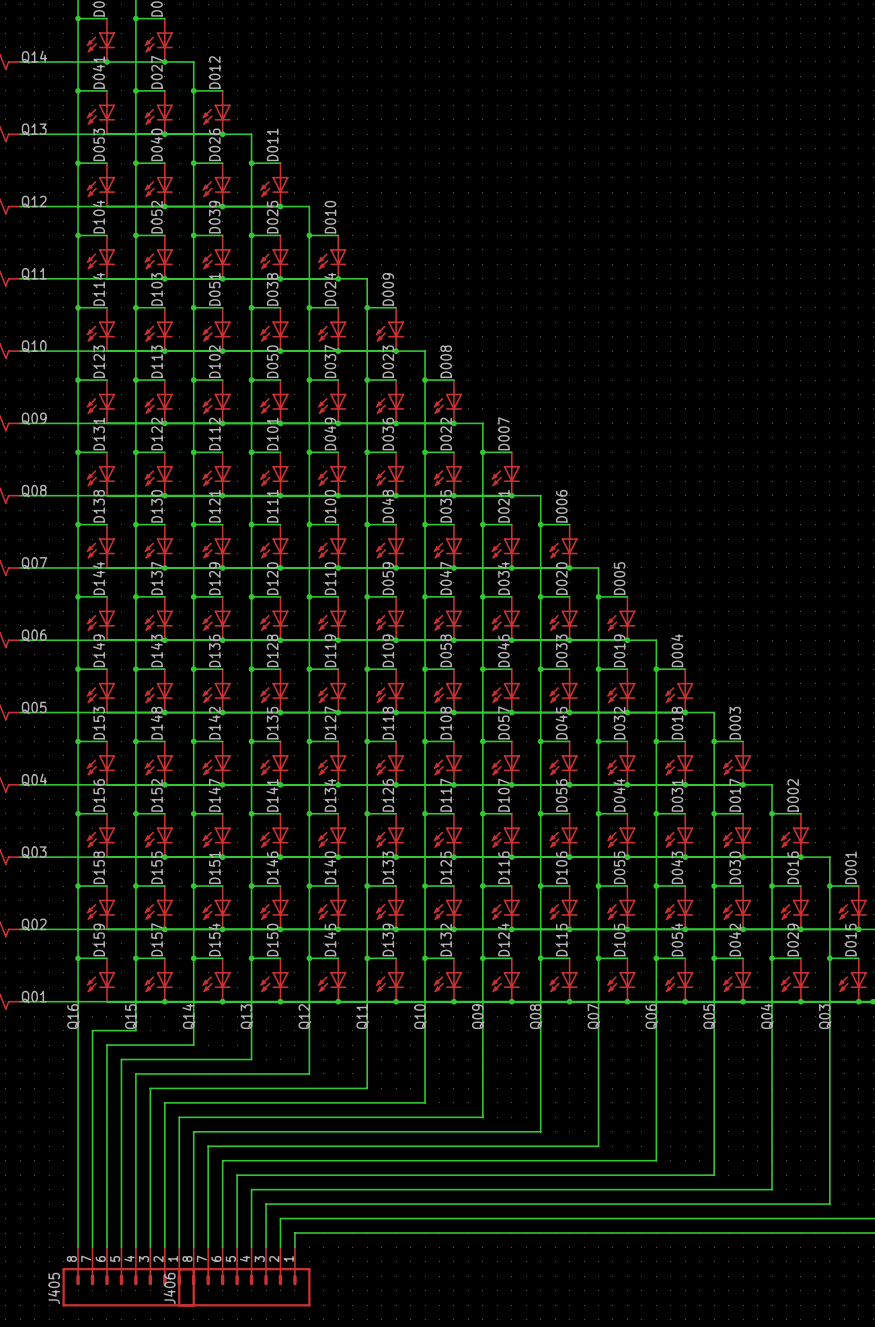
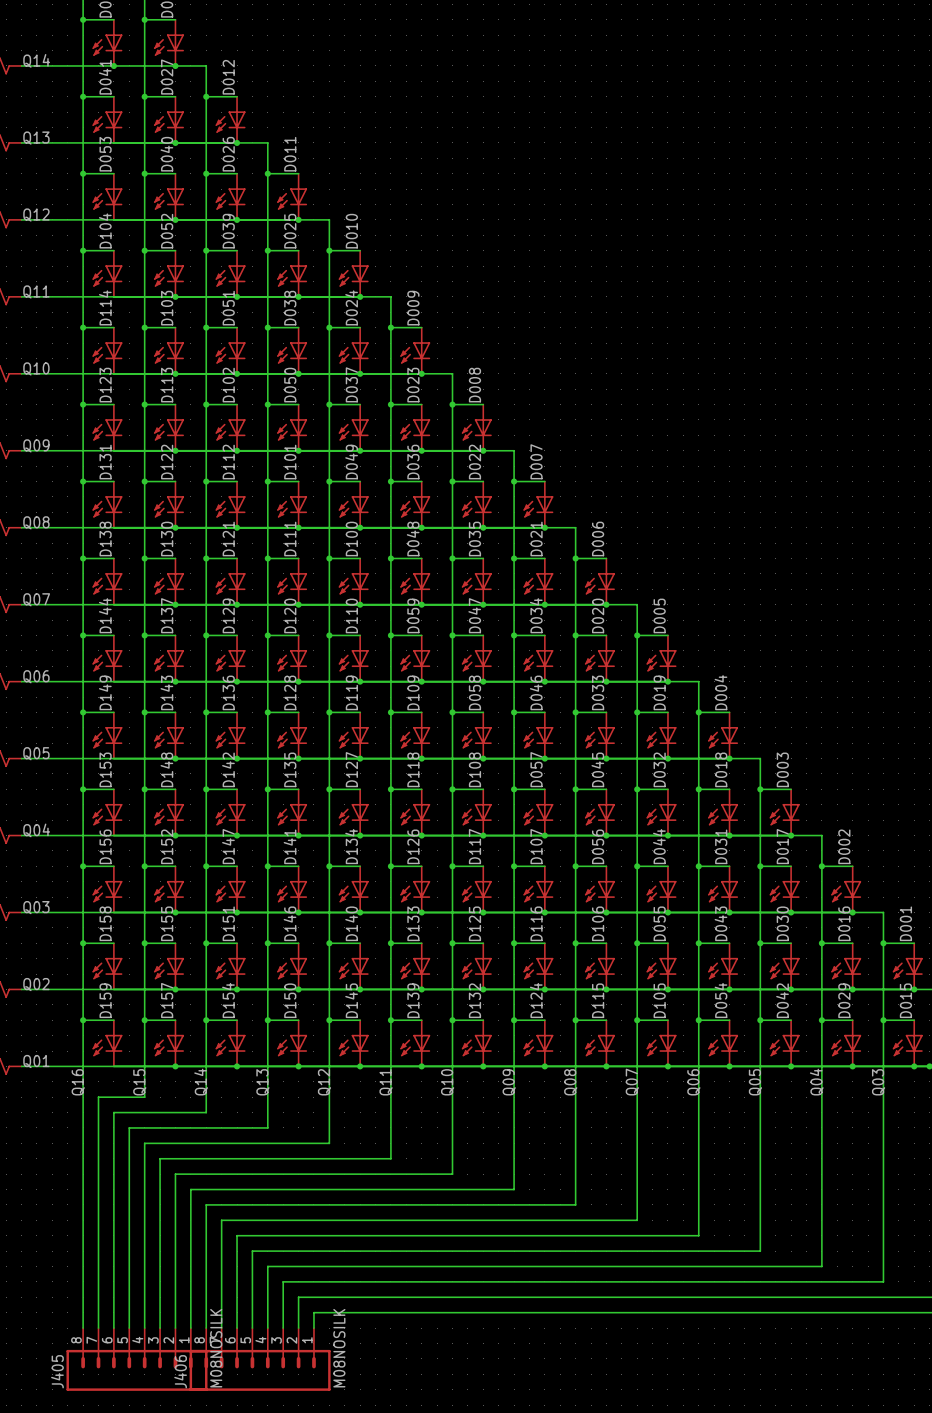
J405 value: none -> M08NOSILK (216, 1348)
J406 value: none -> M08NOSILK (339, 1348)

